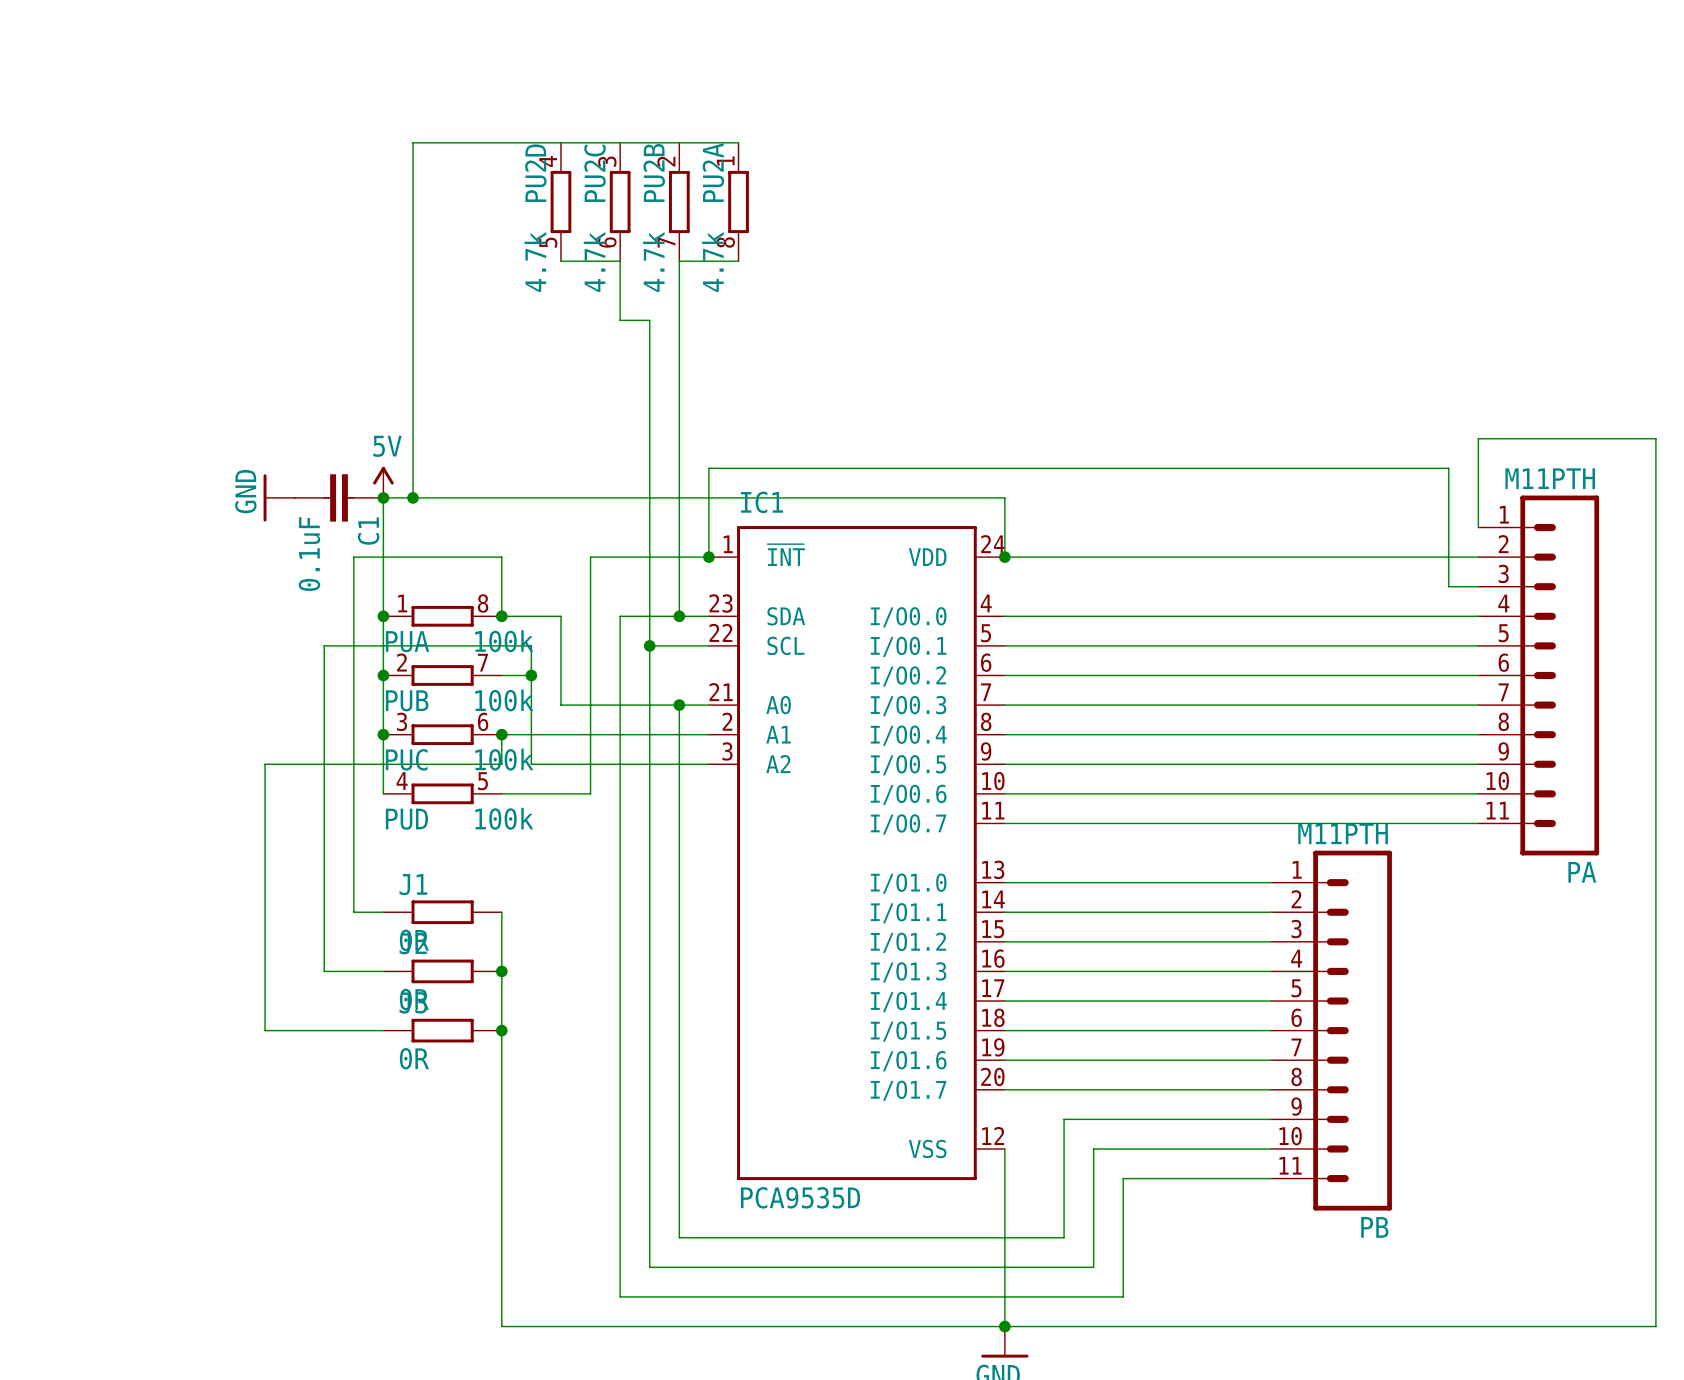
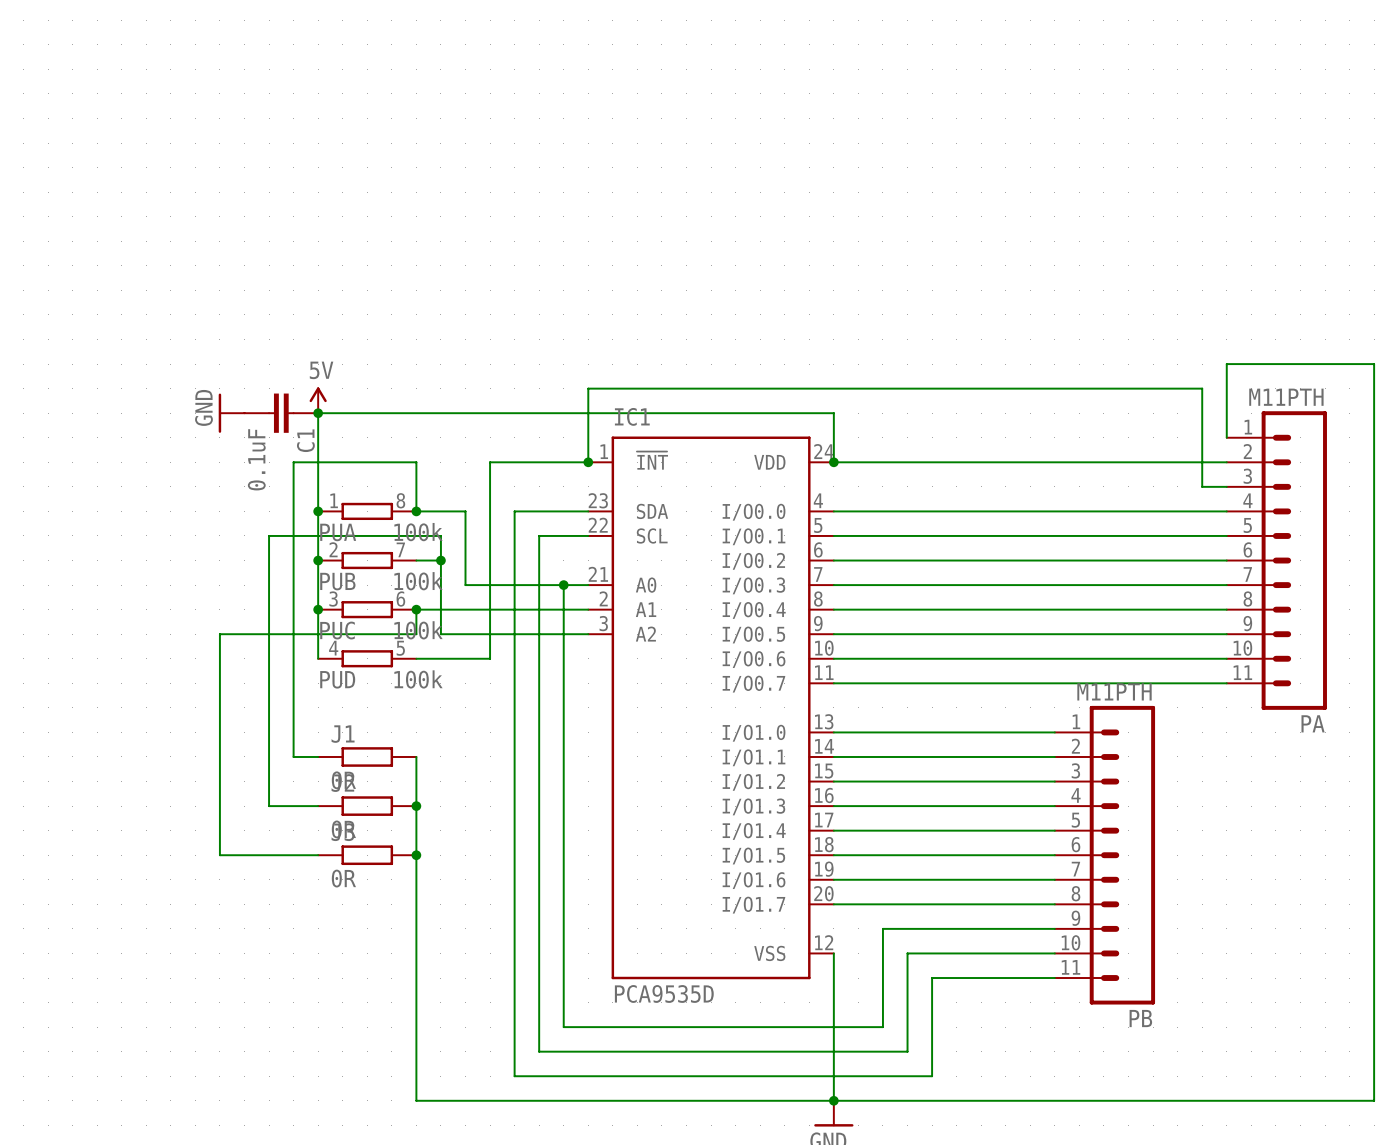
wire: (738, 142) (413, 142) (413, 497) -> none
PU2D: 4.7k (560, 202) -> none
PU2C: 4.7k (620, 202) -> none
PU2B: 4.7k (679, 202) -> none
PU2A: 4.7k (738, 202) -> none
wire: (560, 261) (620, 261) (620, 320) (649, 320) (649, 645) -> none
wire: (738, 261) (679, 261) (679, 616) -> none
junction: (413, 497) -> none
junction: (679, 616) -> none
junction: (649, 645) -> none

